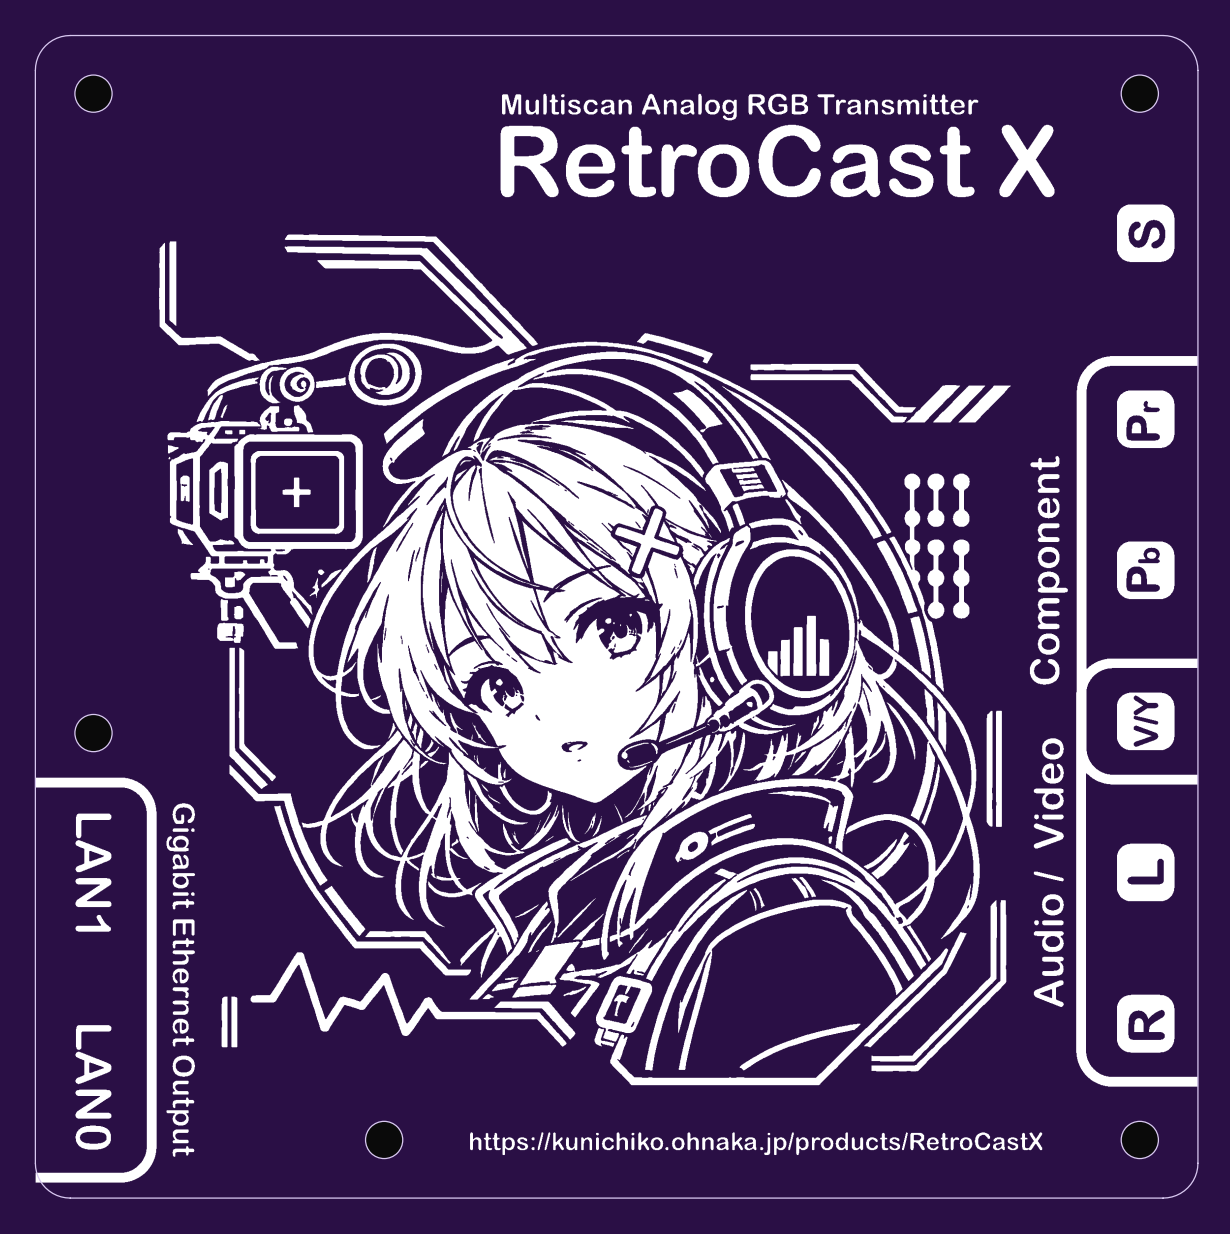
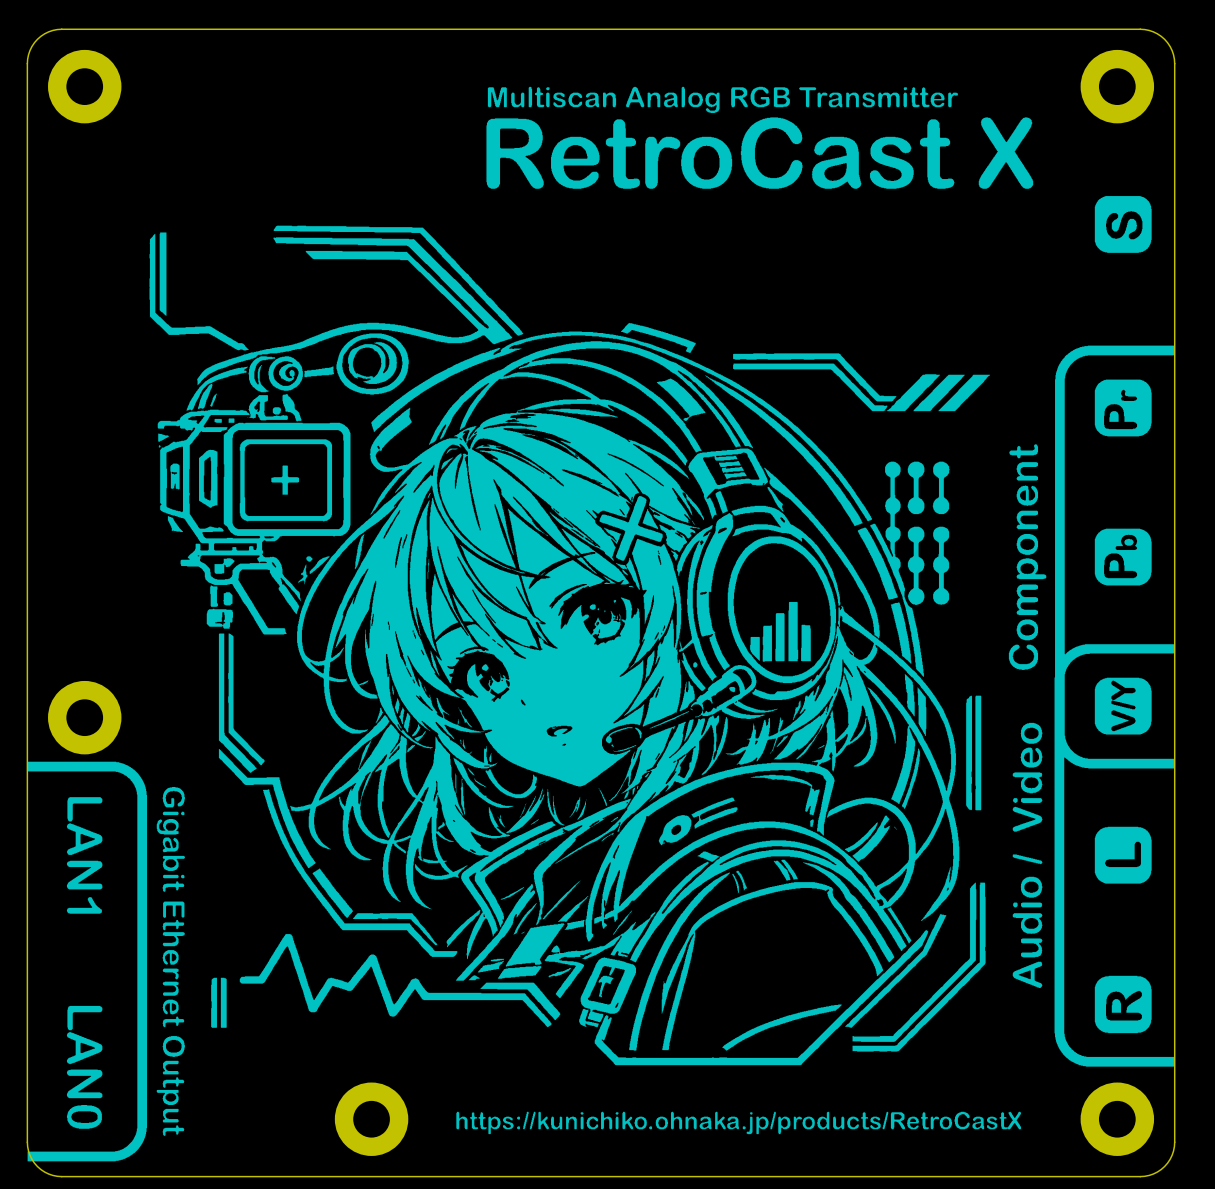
part footprint: [74, 75, 113, 113] -> [48, 49, 122, 124]
part footprint: [1121, 75, 1159, 113] -> [1080, 49, 1155, 124]
part footprint: [74, 714, 113, 752] -> [48, 680, 122, 755]
part footprint: [365, 1121, 403, 1159] -> [334, 1082, 409, 1156]
part footprint: [1121, 1121, 1159, 1159] -> [1080, 1082, 1155, 1156]

